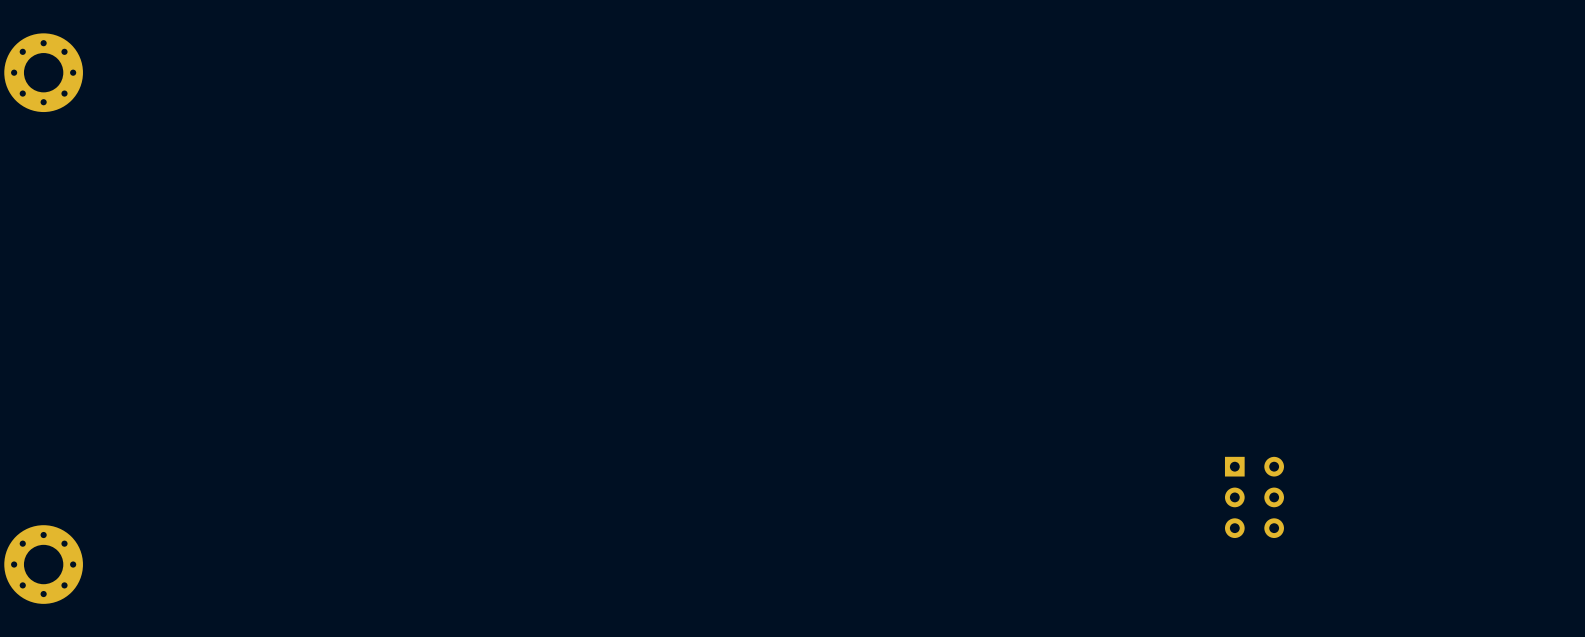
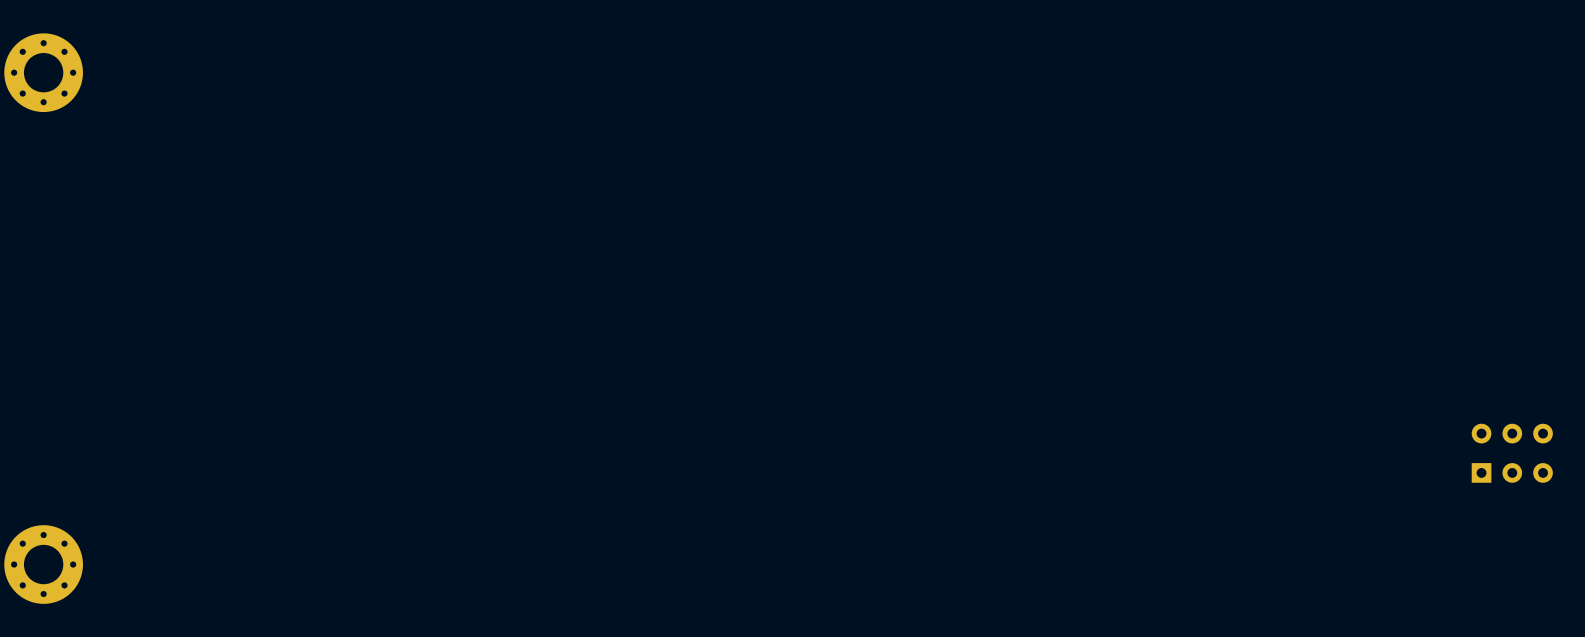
part rotation: 0° (1254, 497) -> 90° counterclockwise (1512, 453)
part position: (1254, 497) -> (1512, 453)

